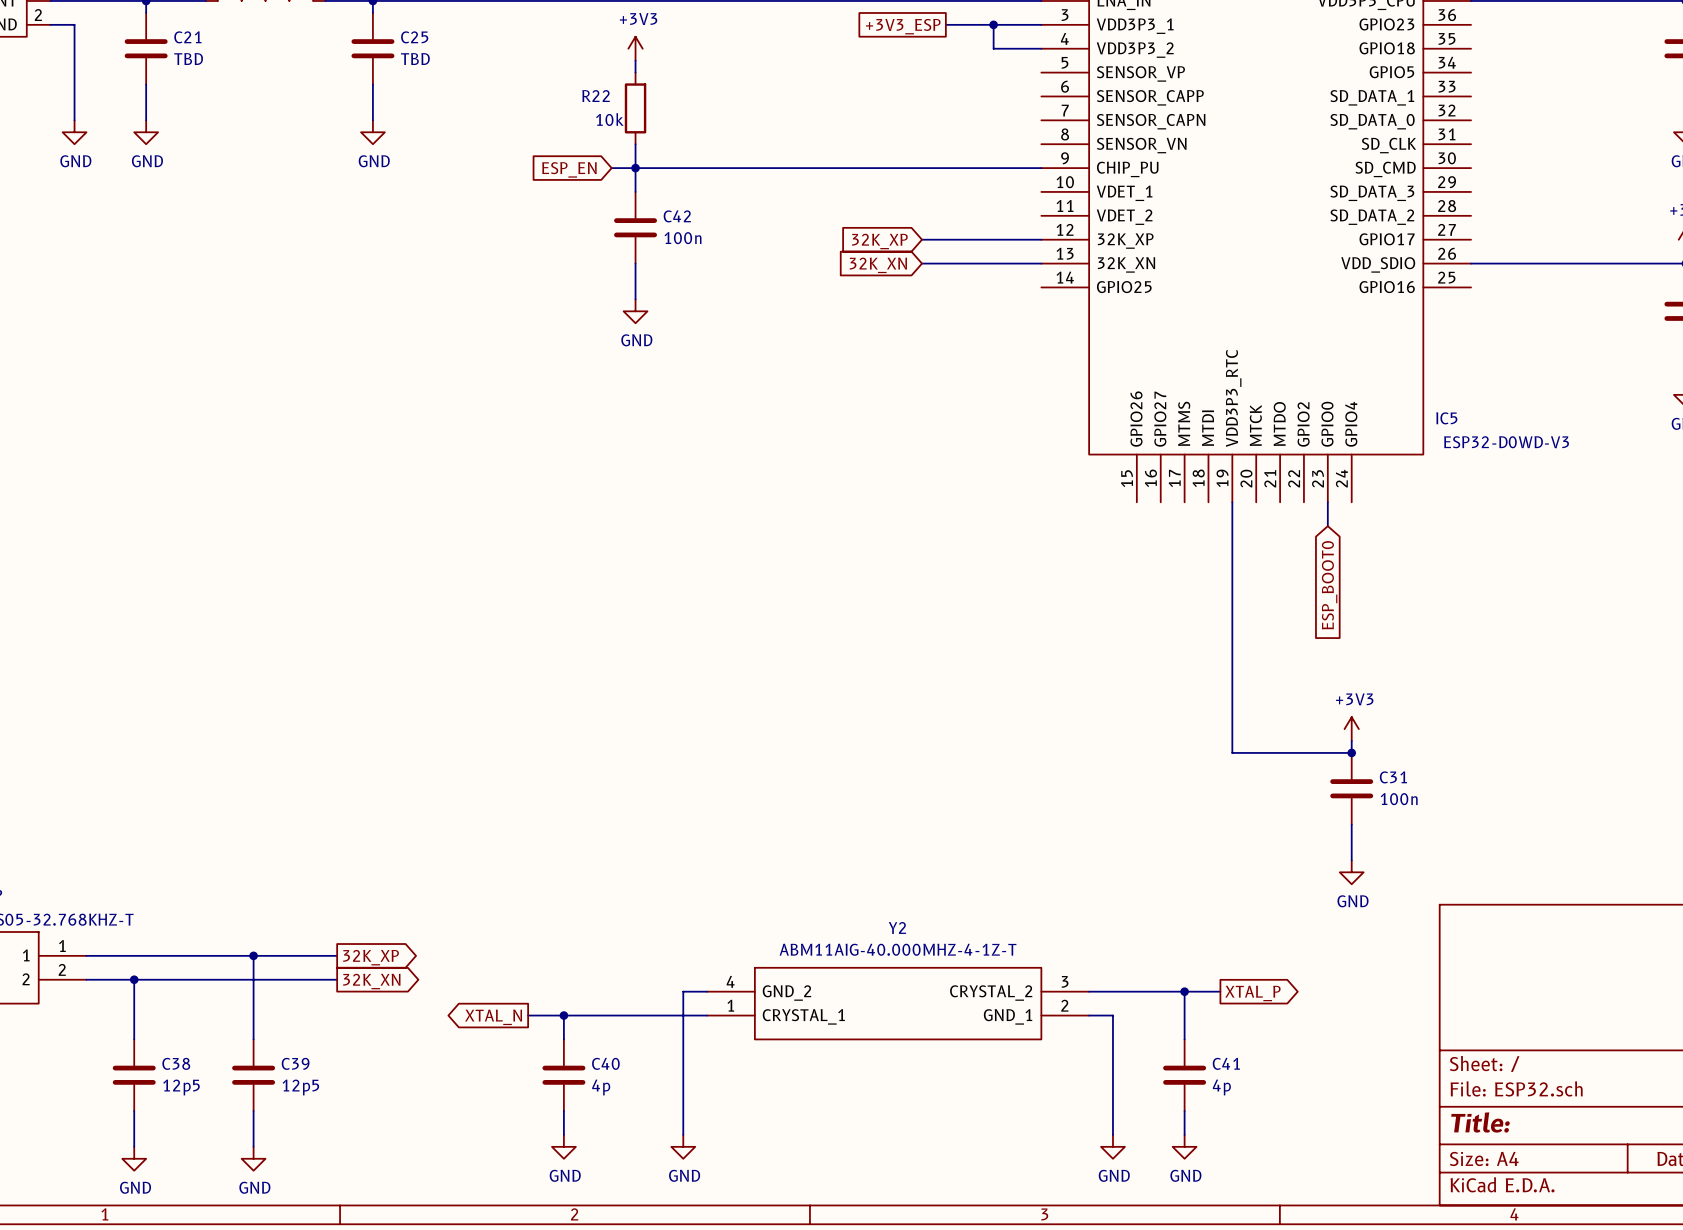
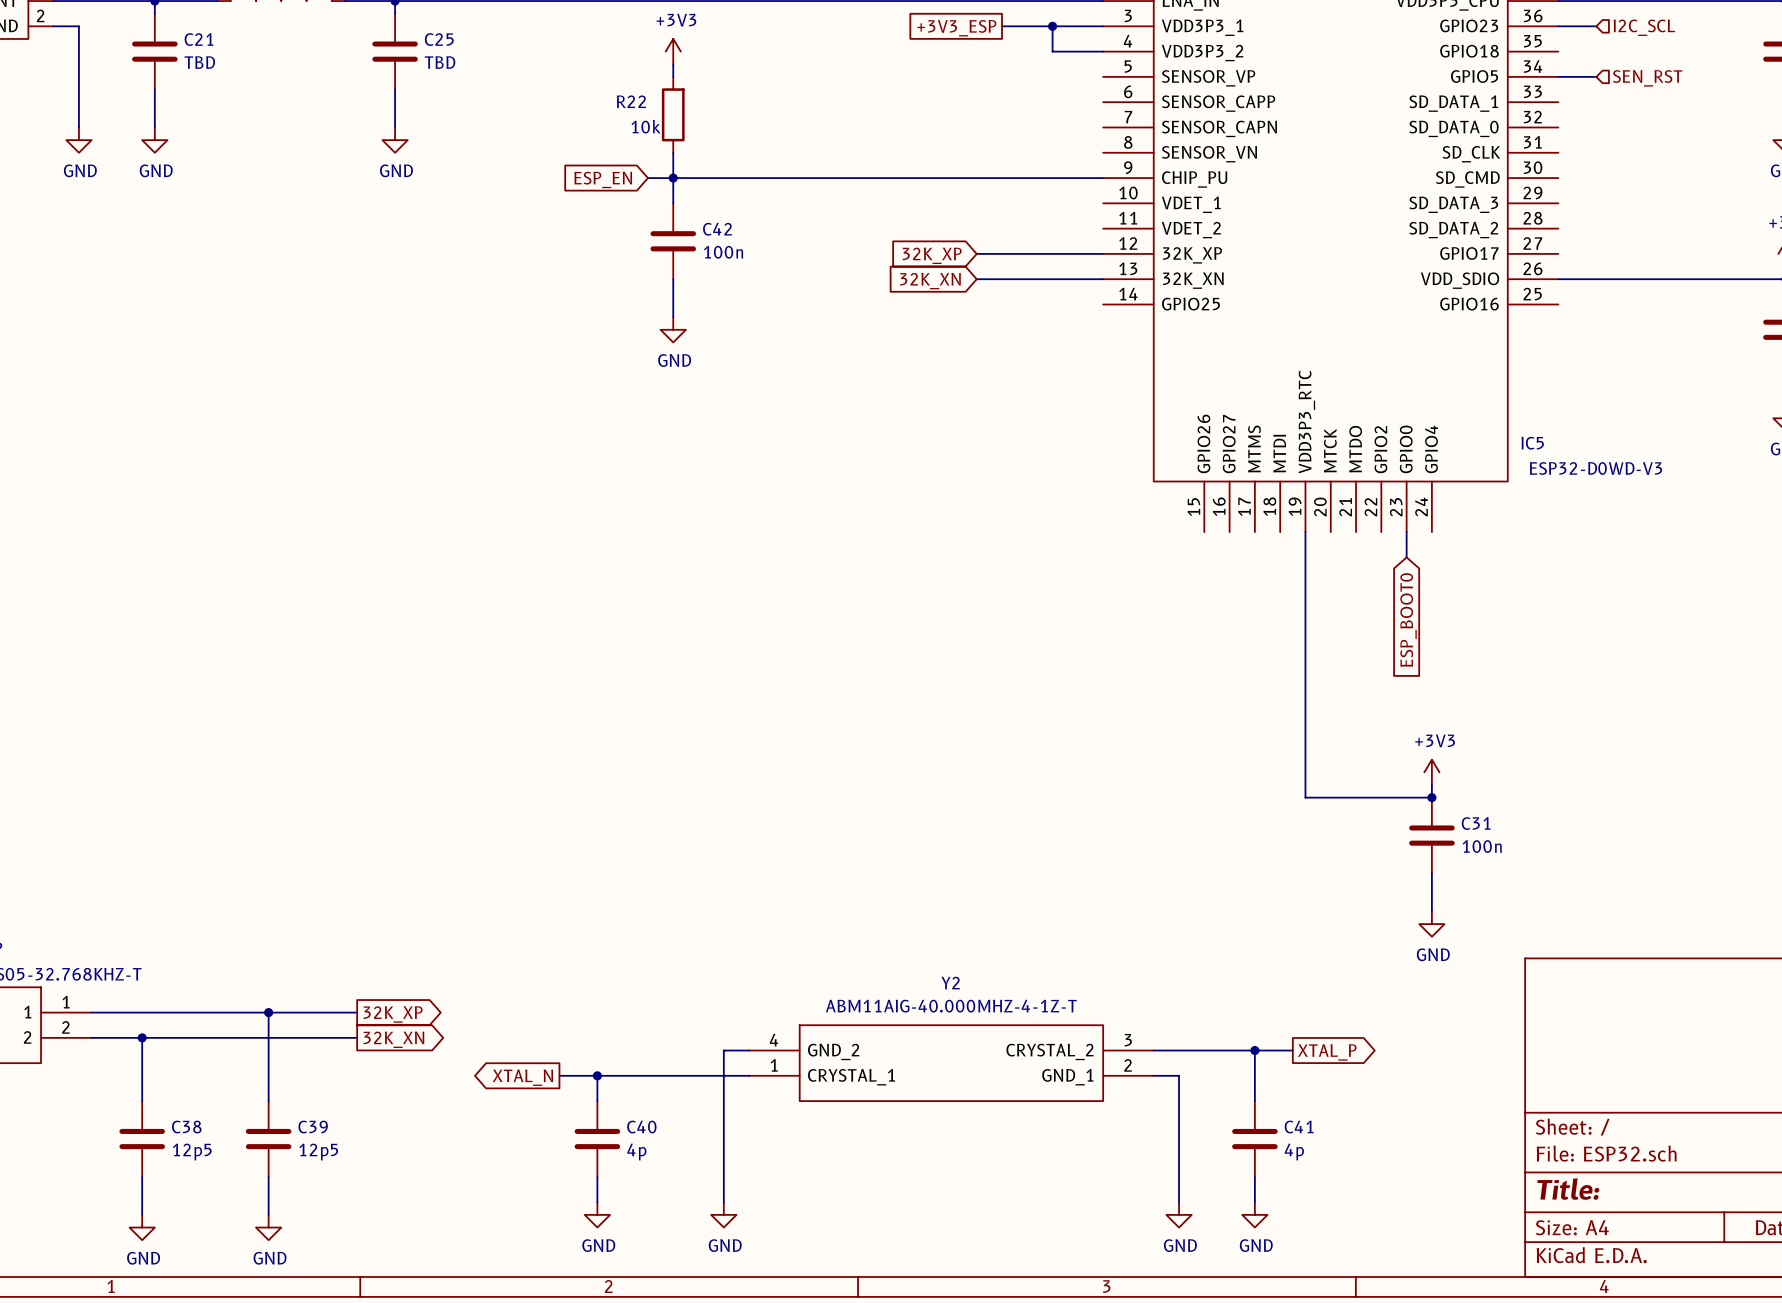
wire: none -> (1558, 26) (1596, 26)
hierarchical label: none -> I2C_SCL (1644, 27)
wire: none -> (1558, 76) (1596, 76)
hierarchical label: none -> SEN_RST (1647, 78)

